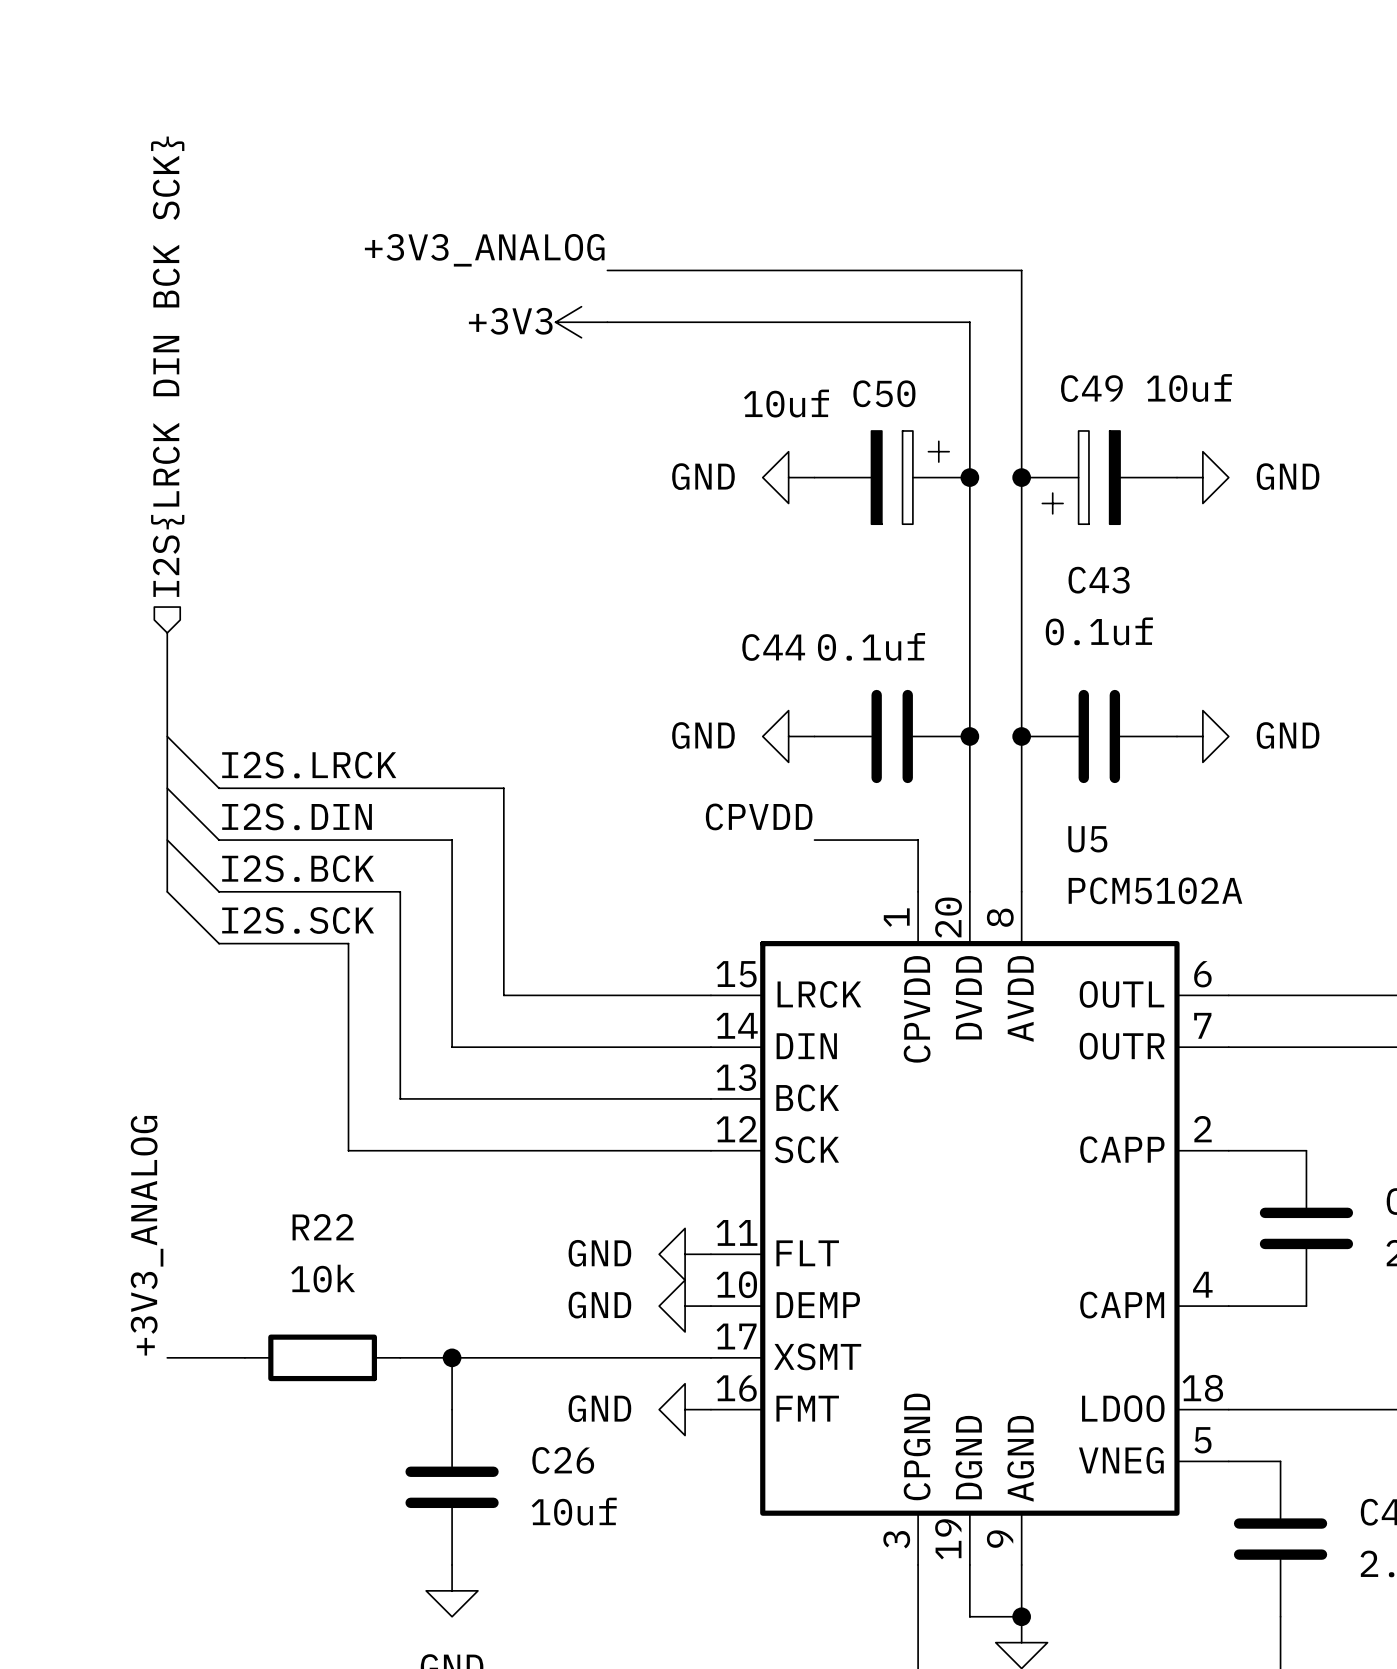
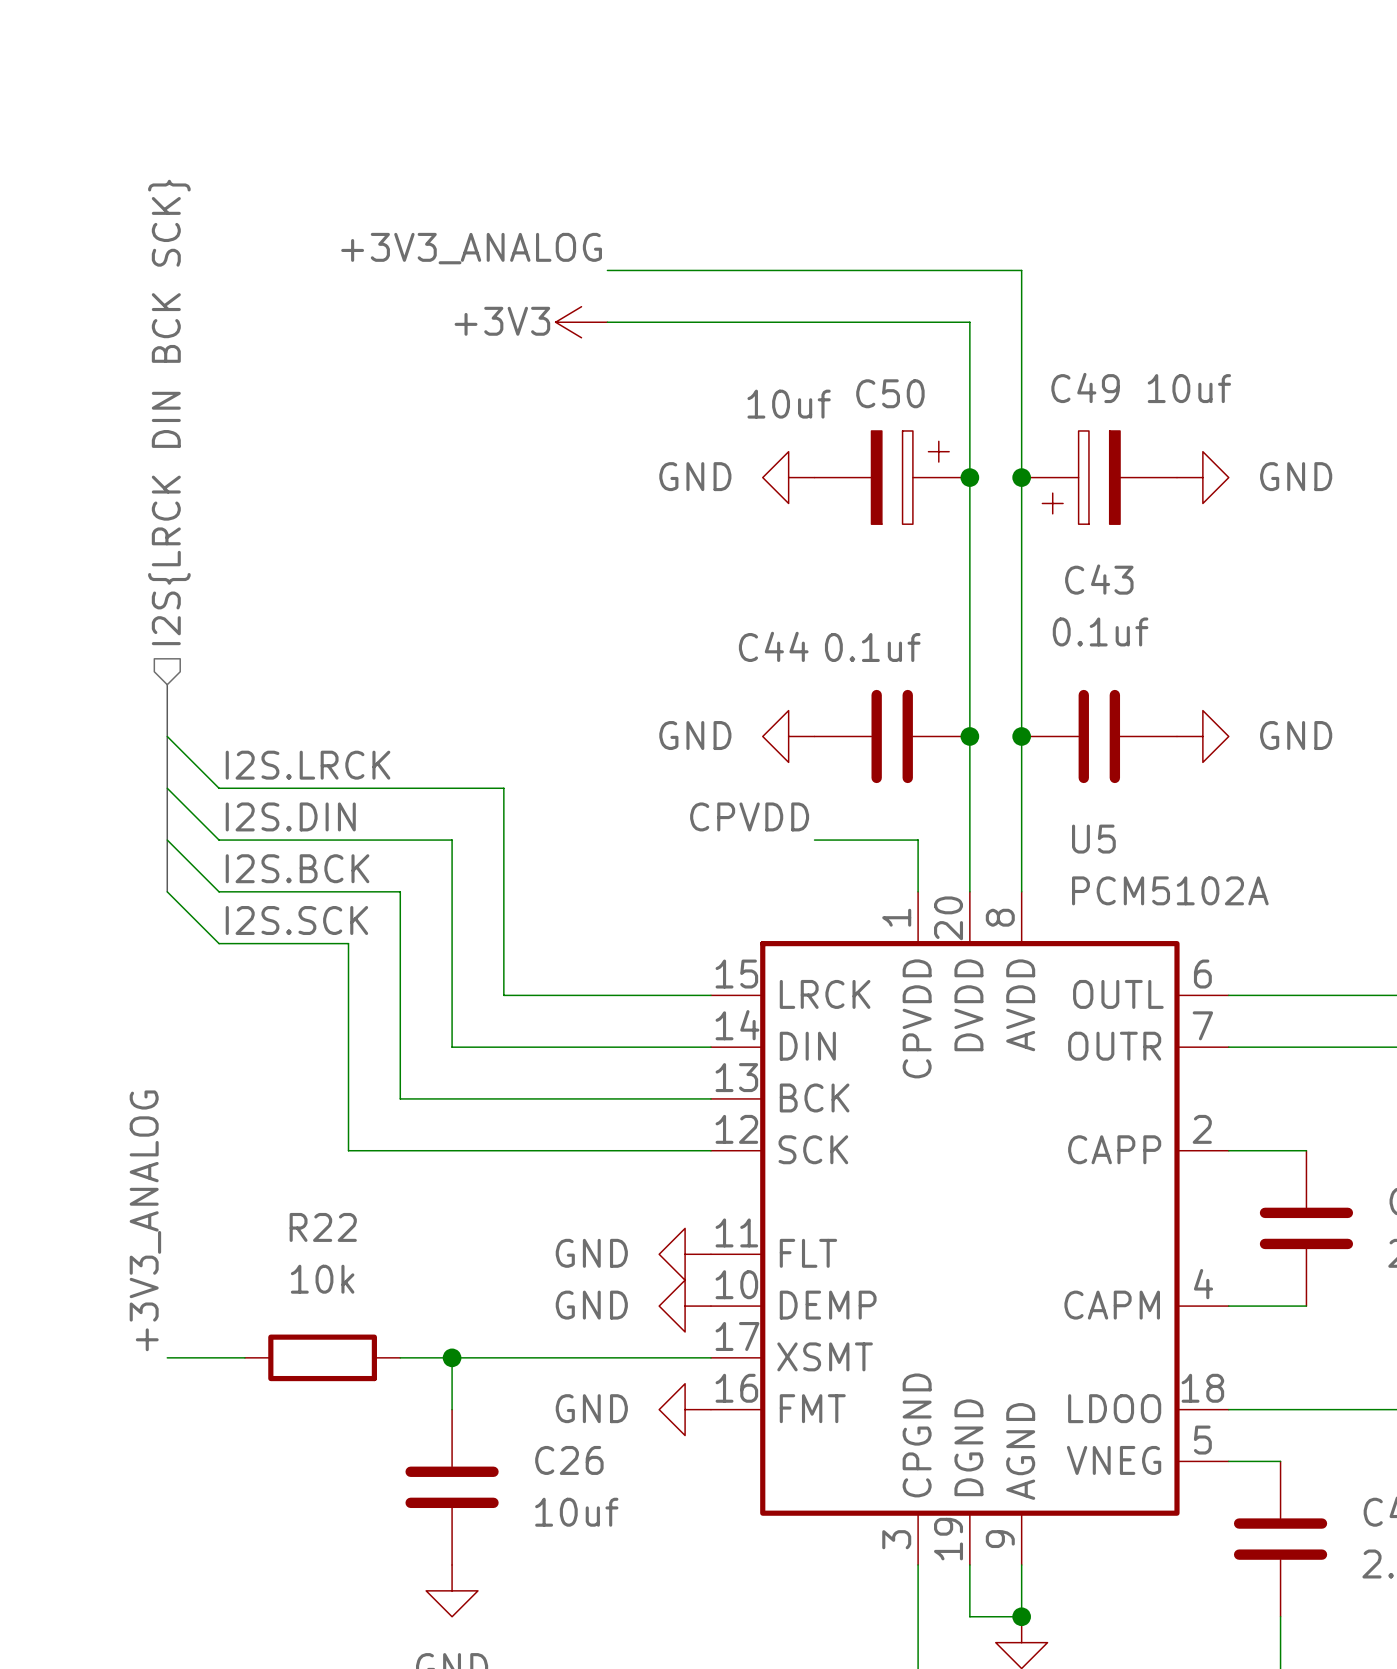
hierarchical label position: I2S{LRCK DIN BCK SCK} (167, 366) -> I2S{LRCK DIN BCK SCK} (169, 412)
bus: (167, 632) (167, 684) -> none

